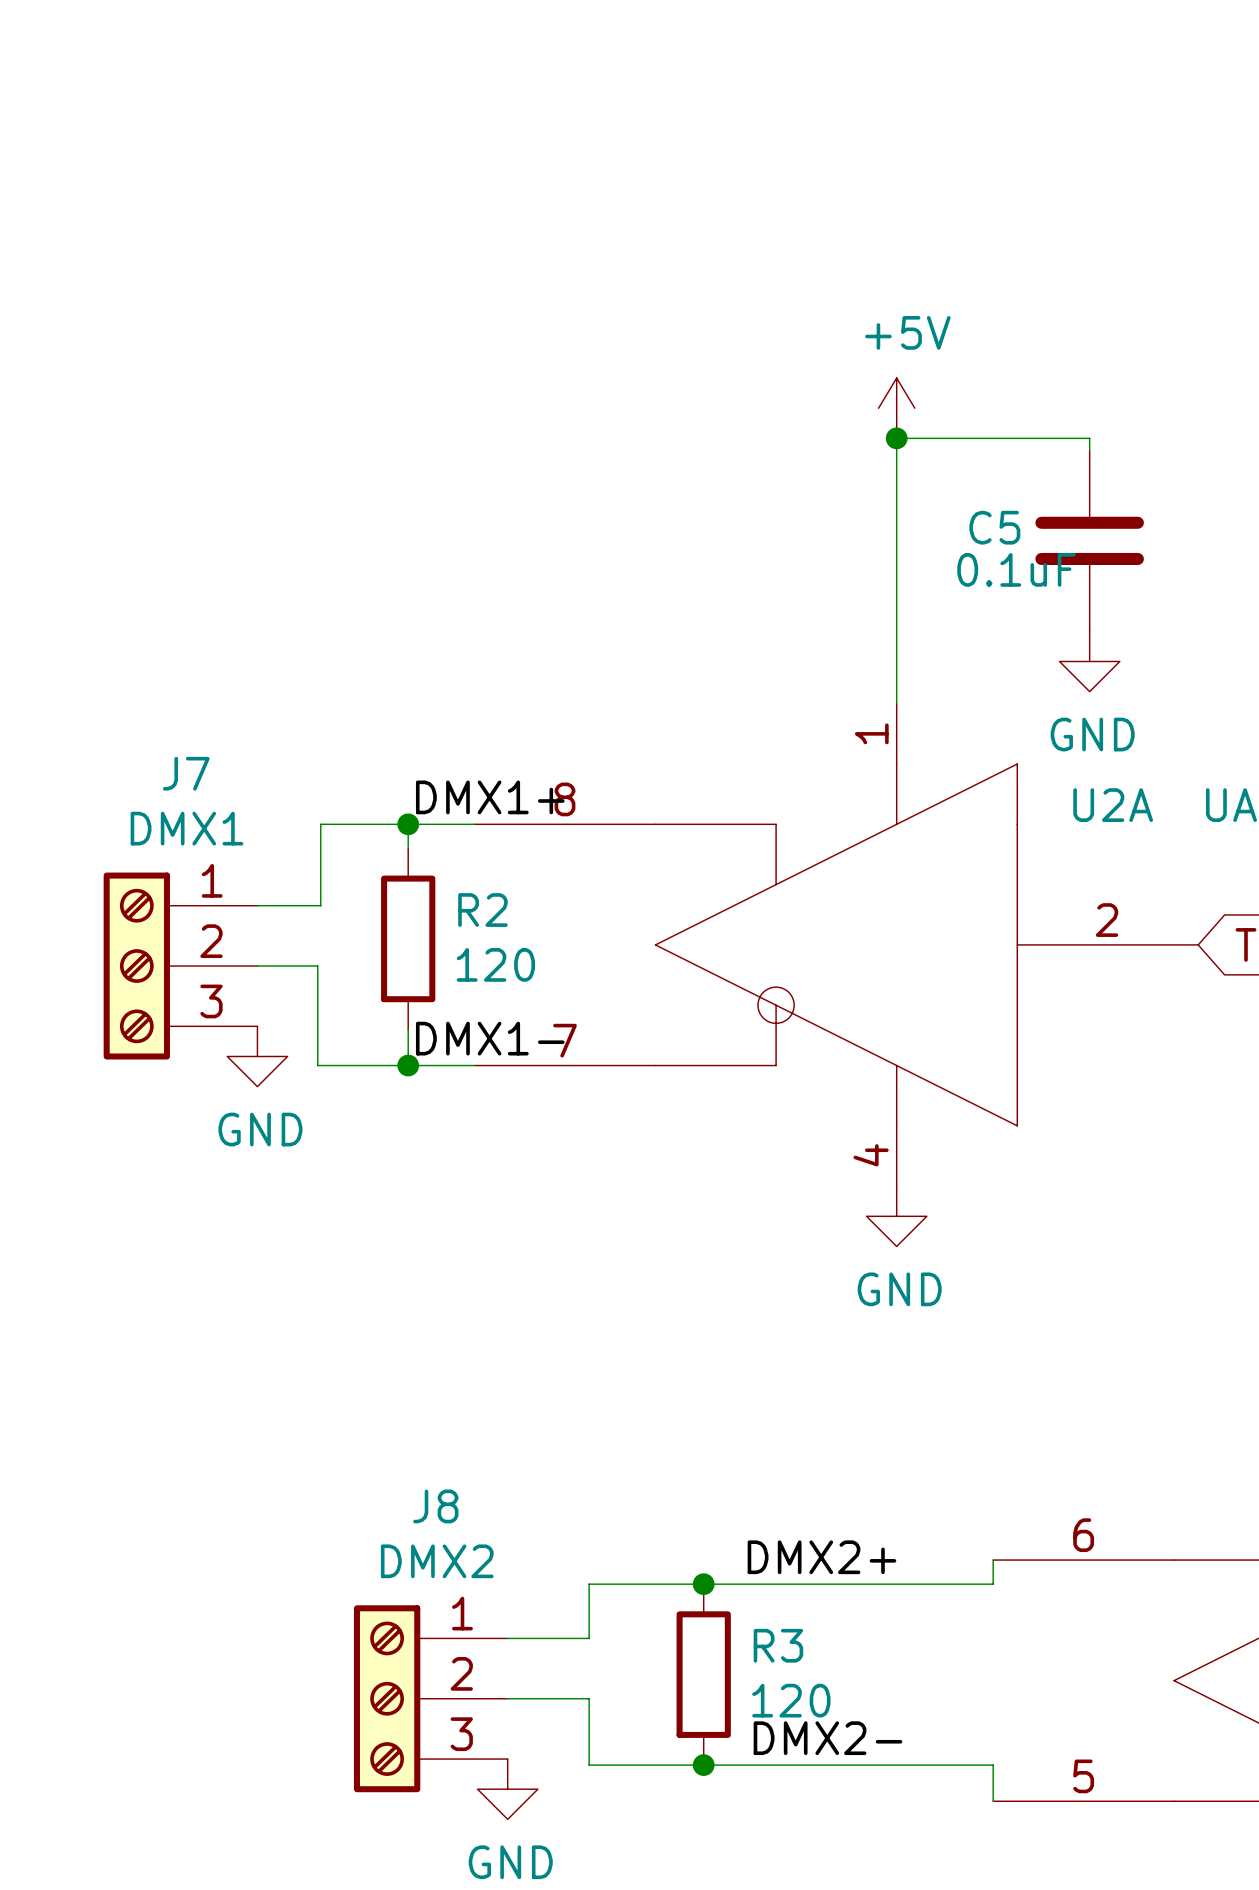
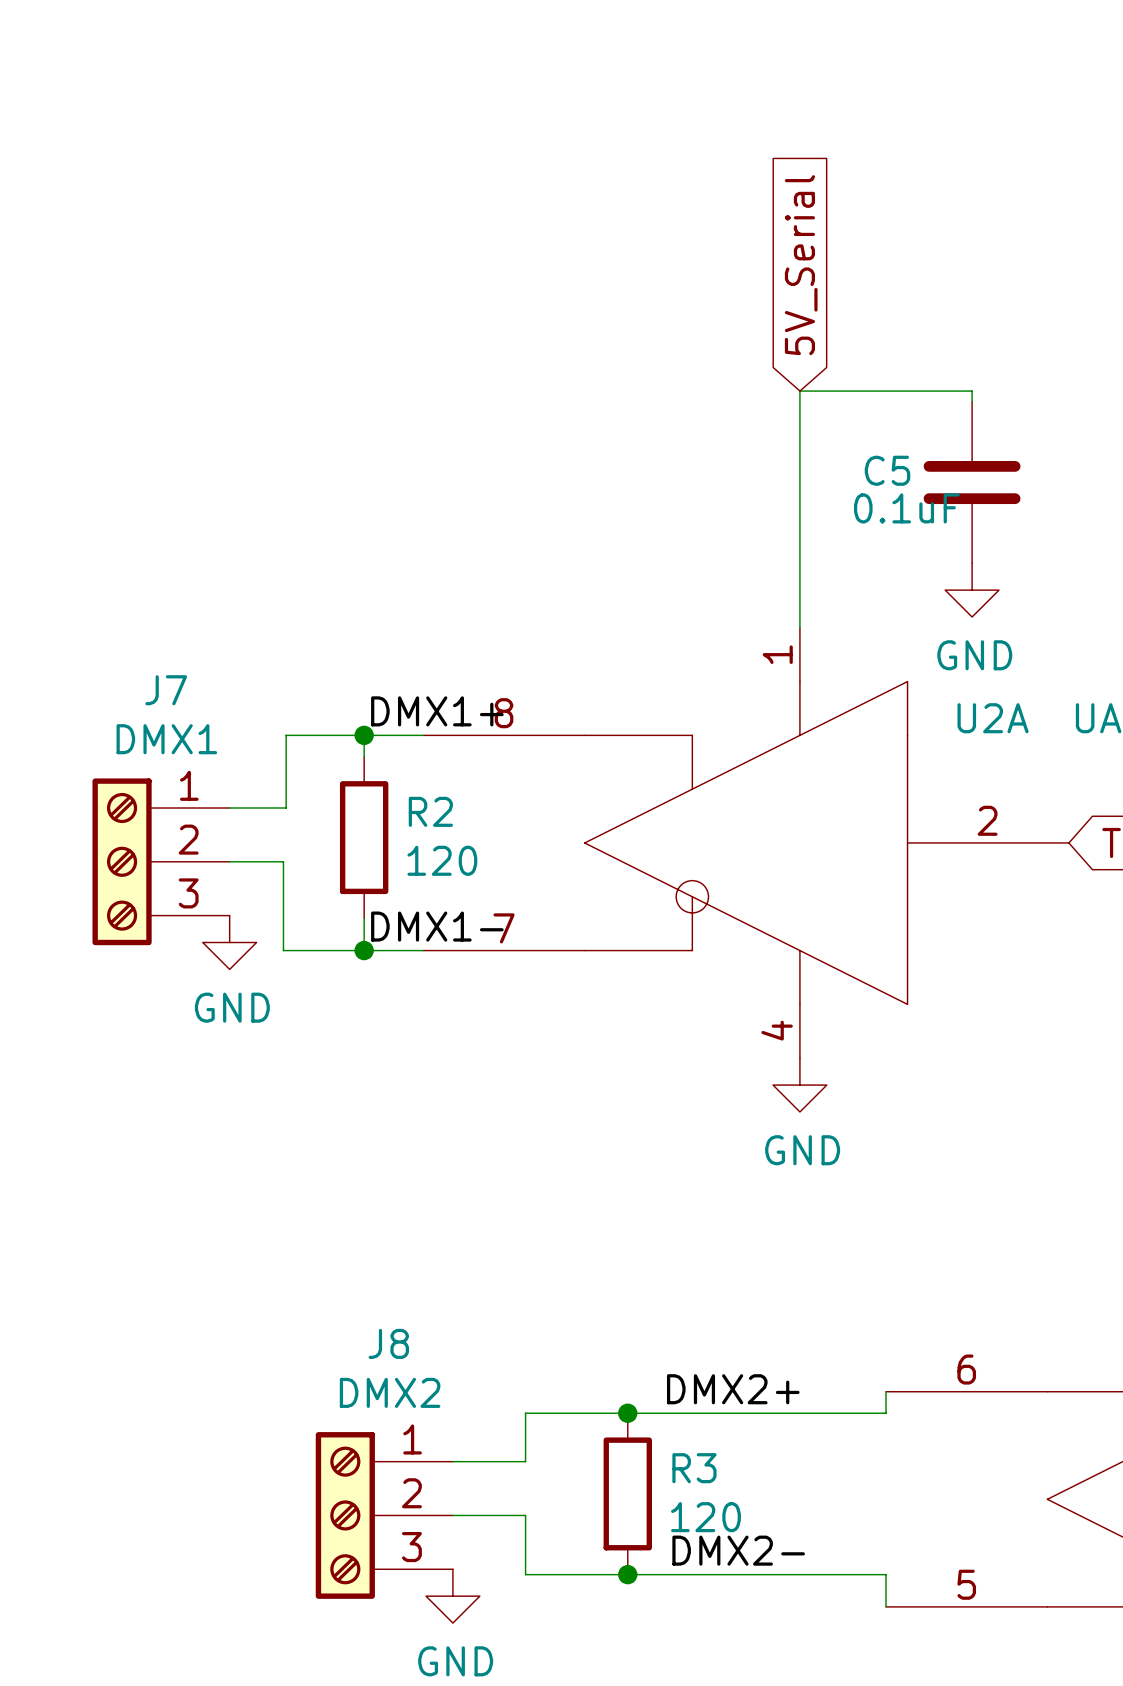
global label: none -> 5V_Serial (801, 265)
power symbol: +5V (896, 408) -> none
junction: (896, 438) -> none

